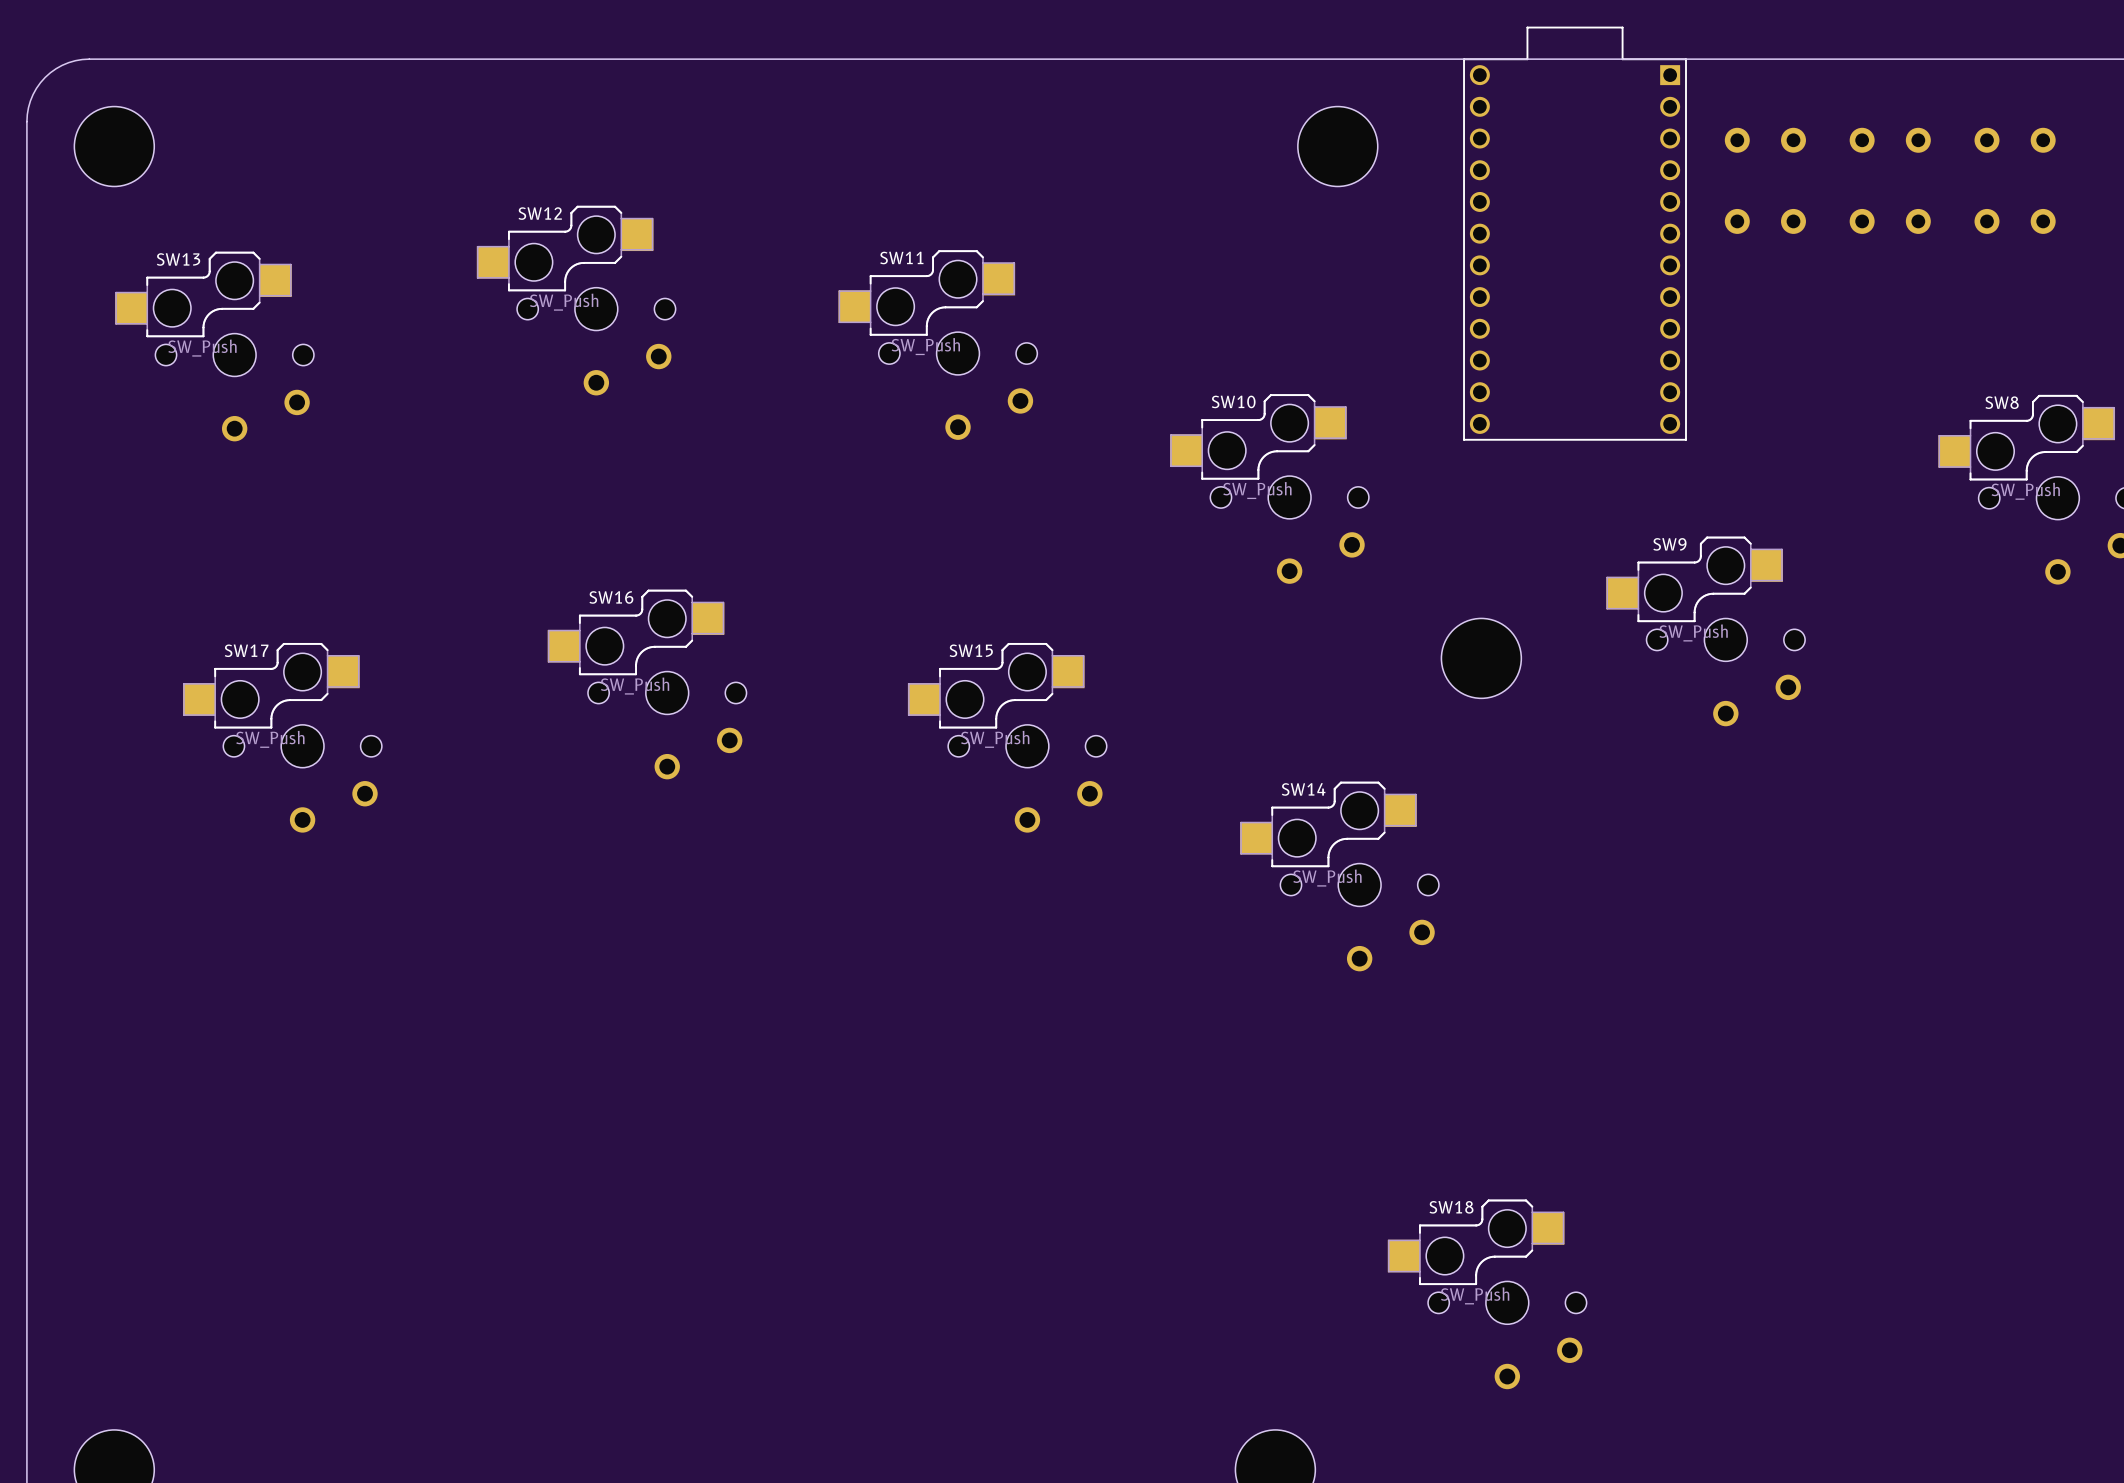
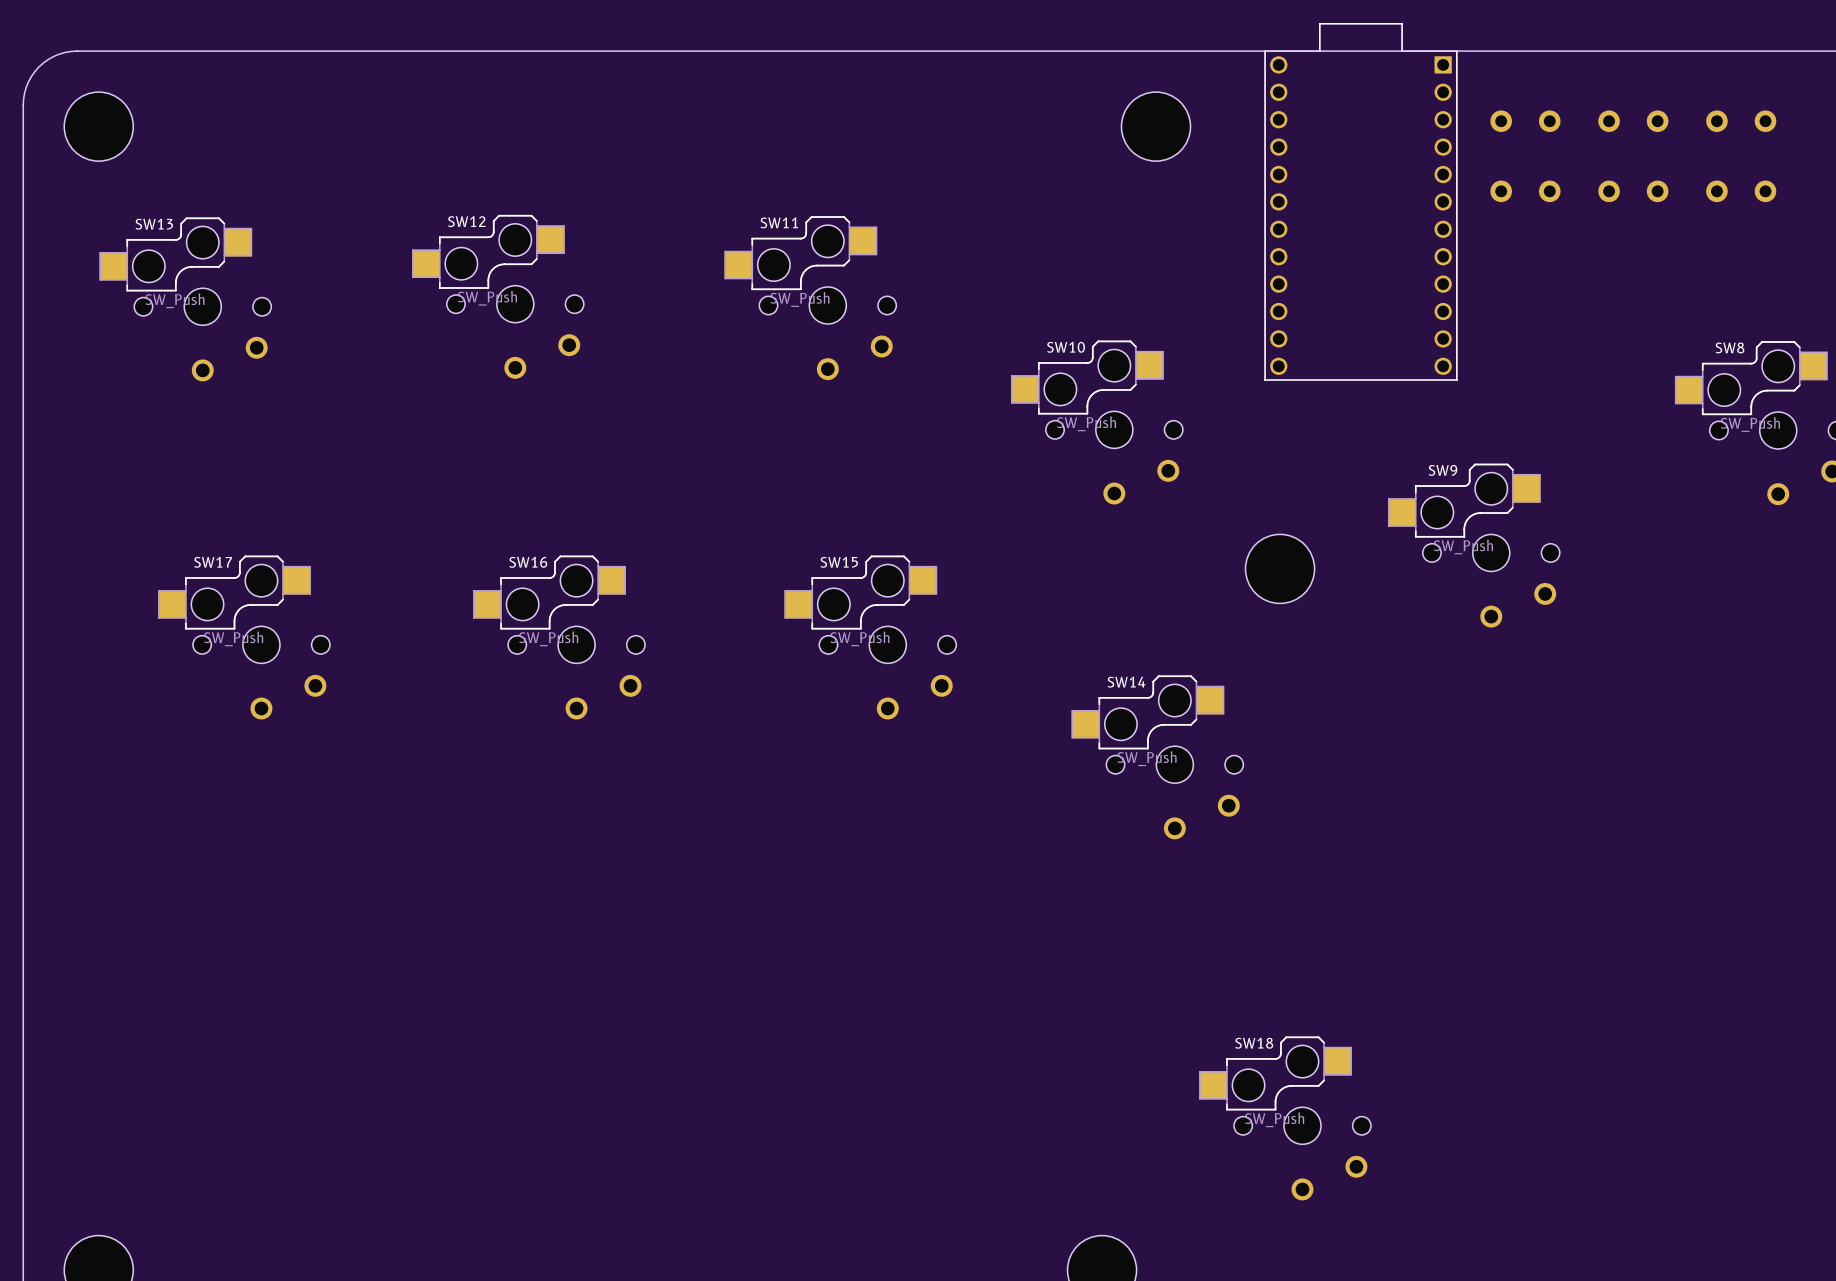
SW12 position: (576, 300) -> (497, 296)
SW16 position: (647, 684) -> (559, 637)

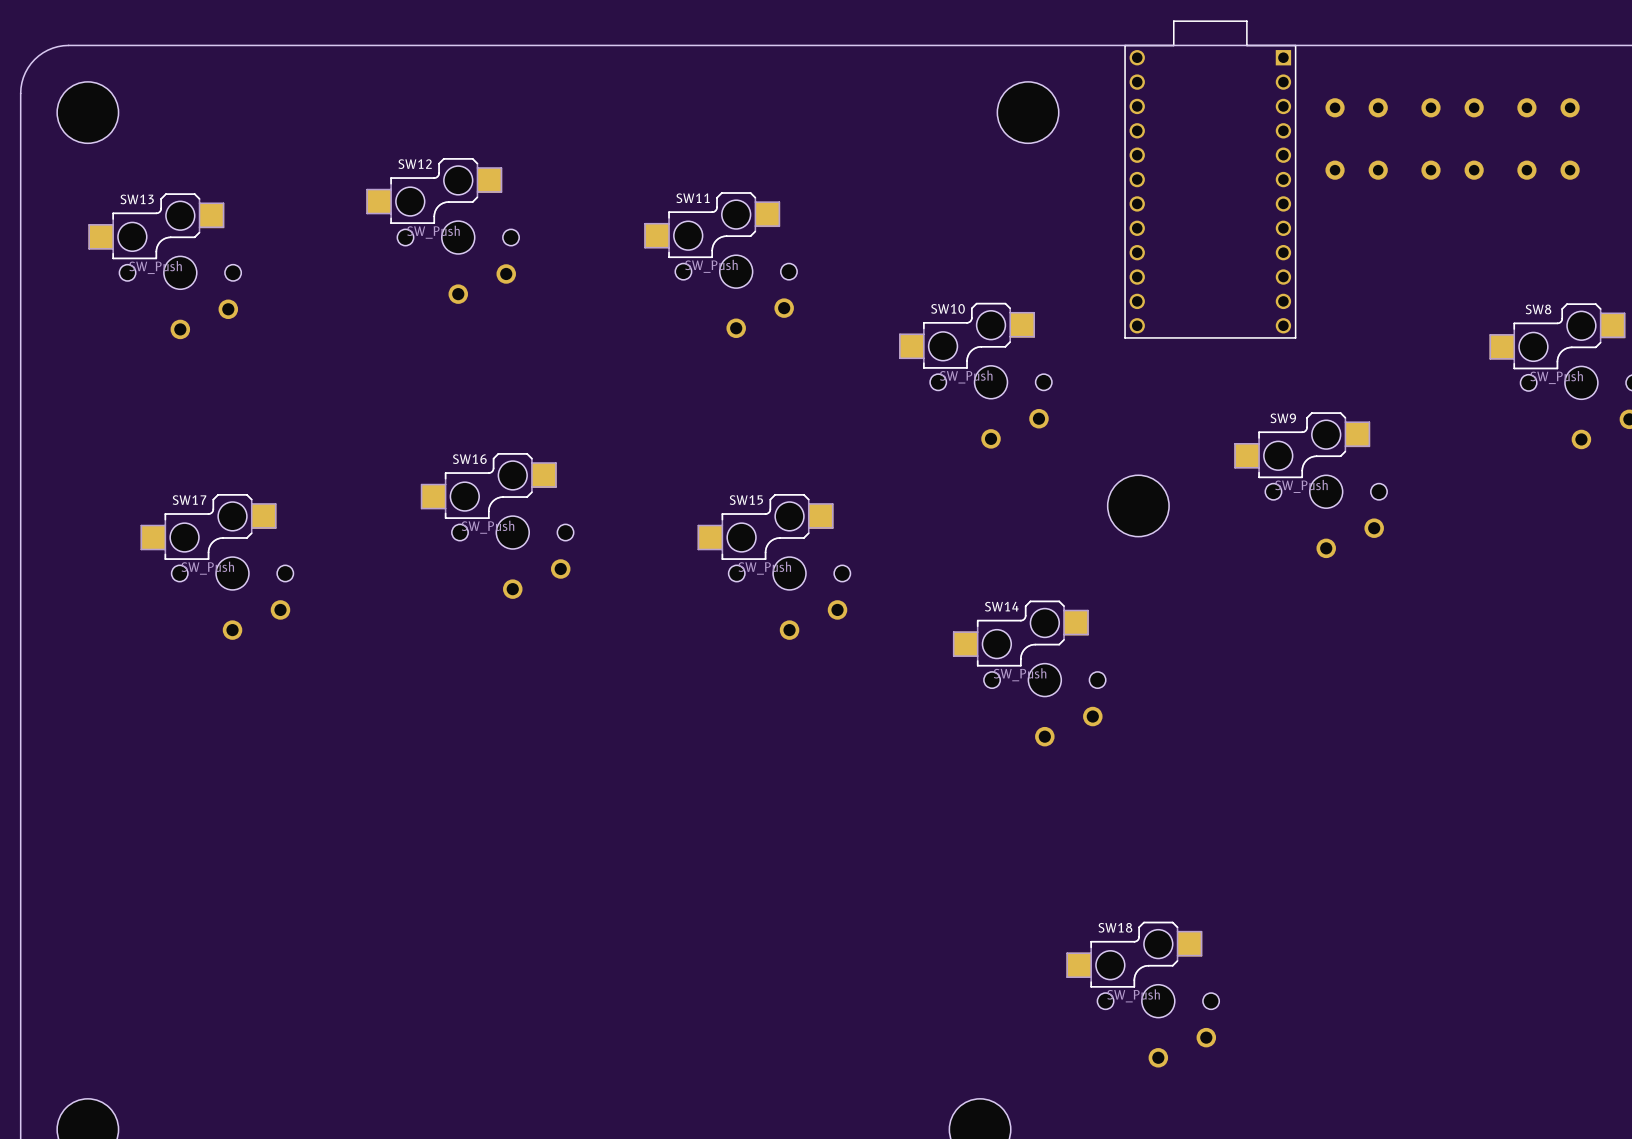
SW12 position: (497, 296) -> (442, 231)
SW16 position: (559, 637) -> (497, 526)

